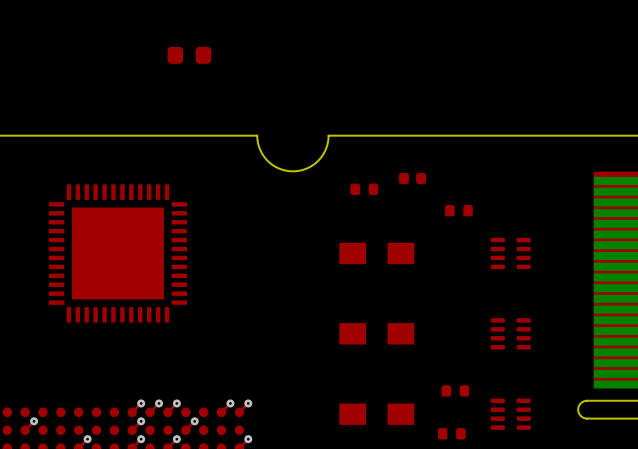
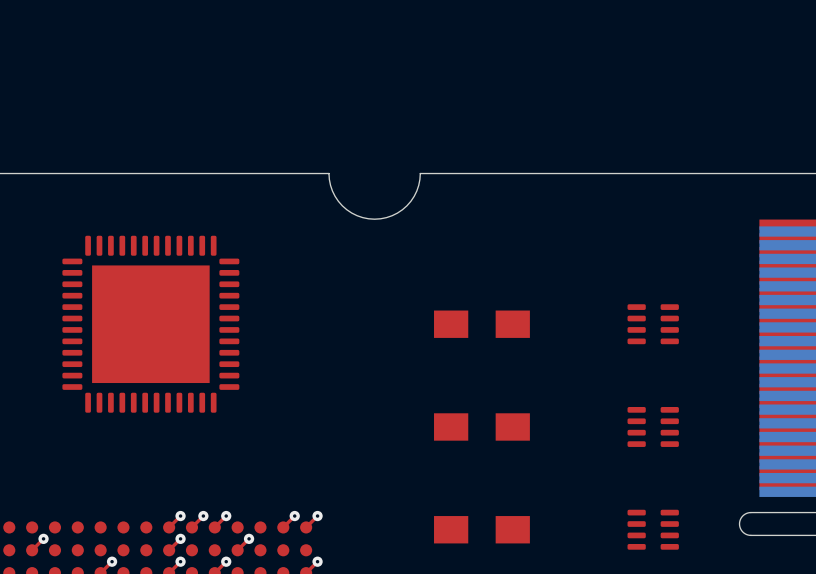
part: (189, 55) -> none
part: (412, 178) -> none
part: (364, 189) -> none
part: (458, 210) -> none
part: (455, 390) -> none
part: (451, 433) -> none

